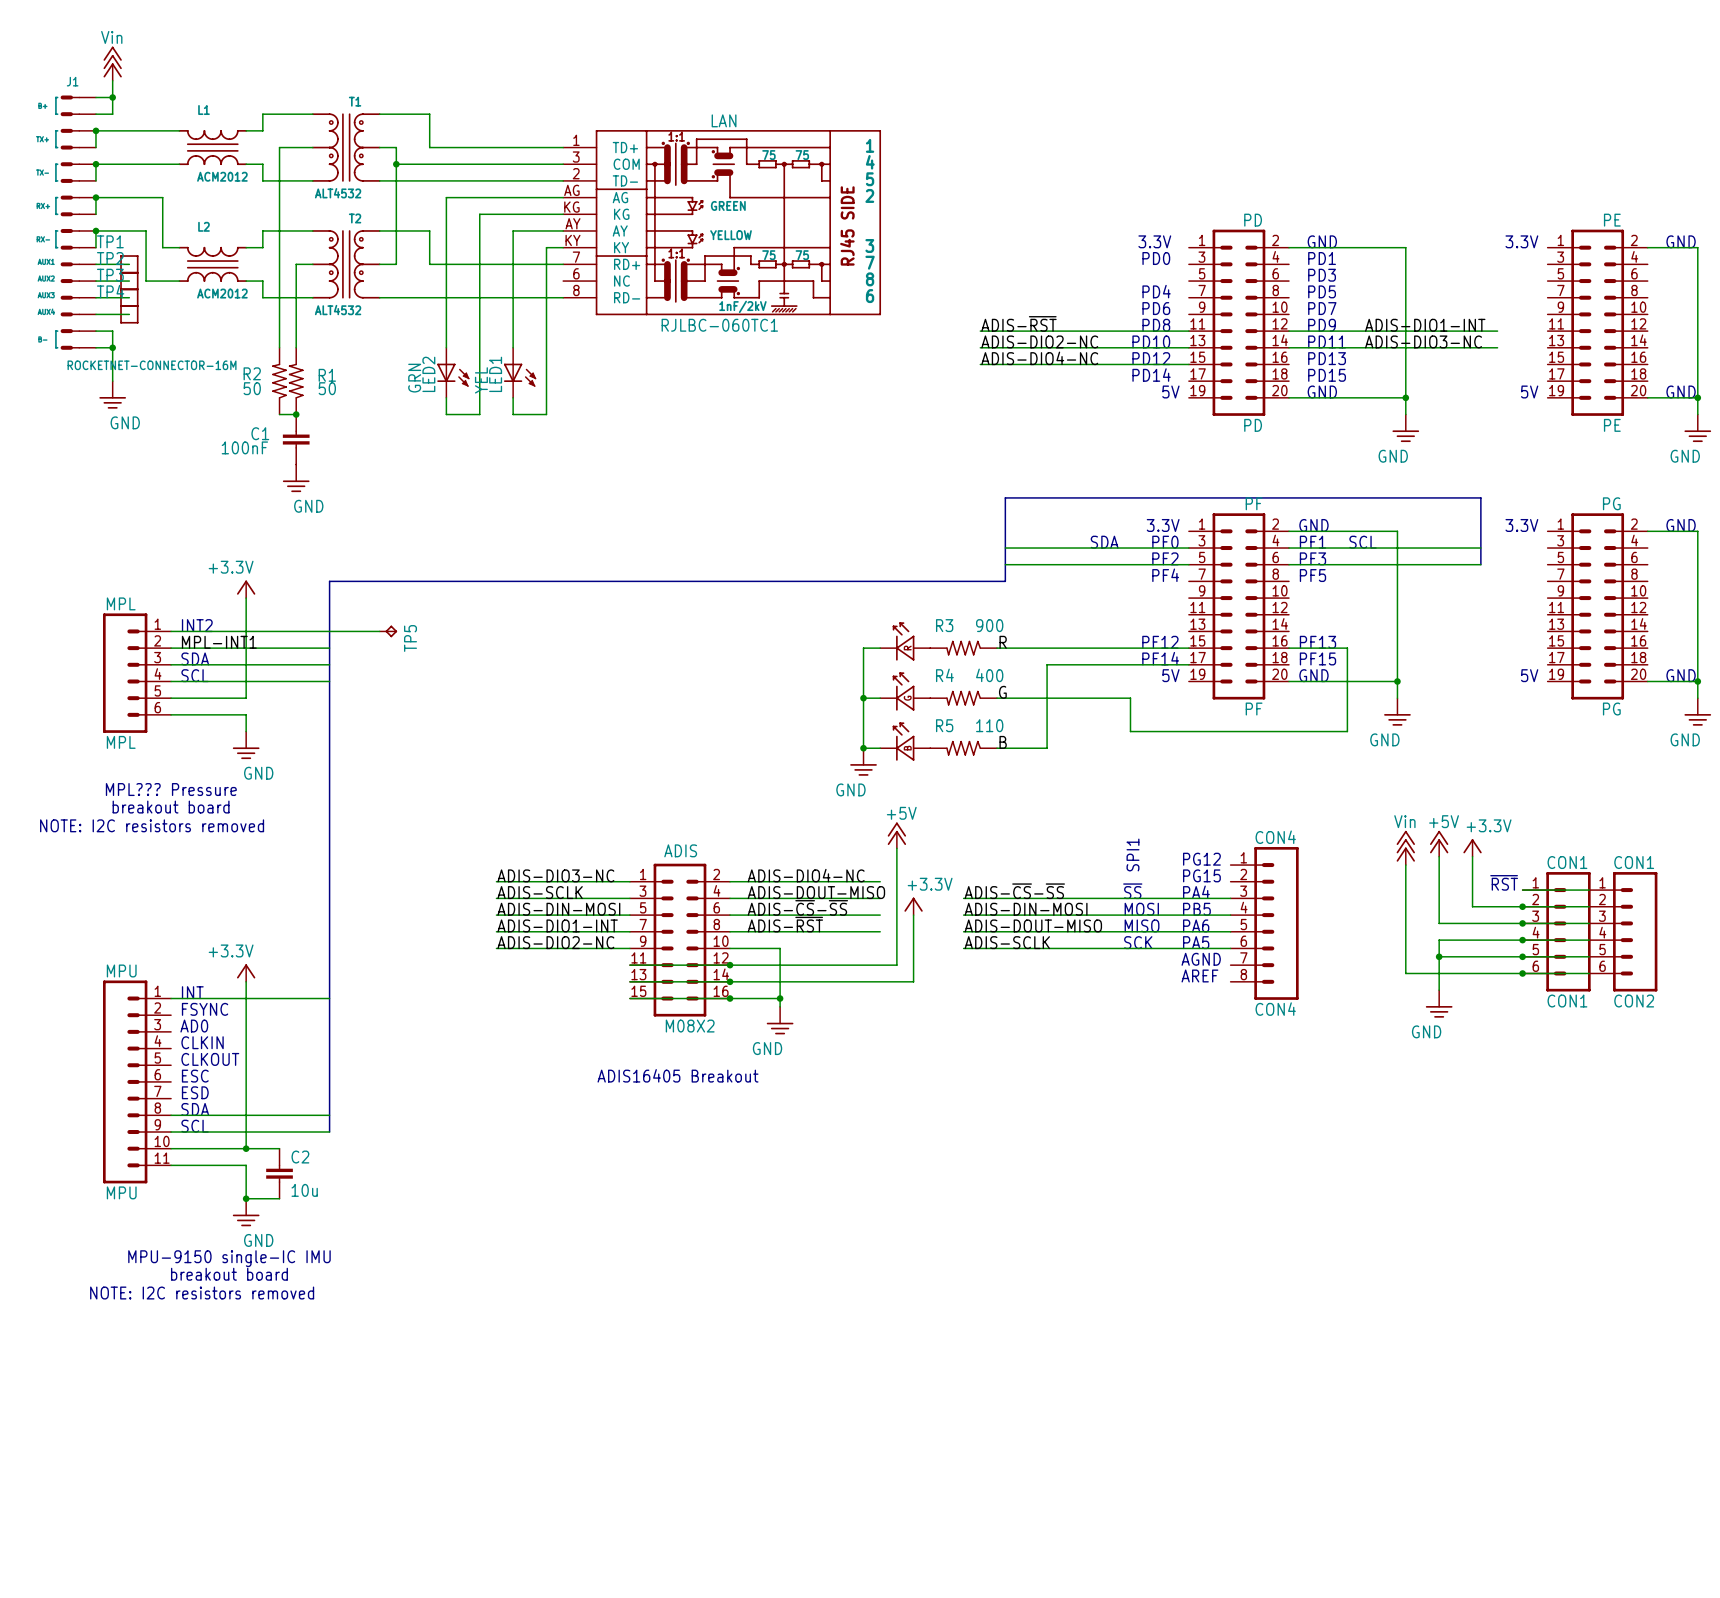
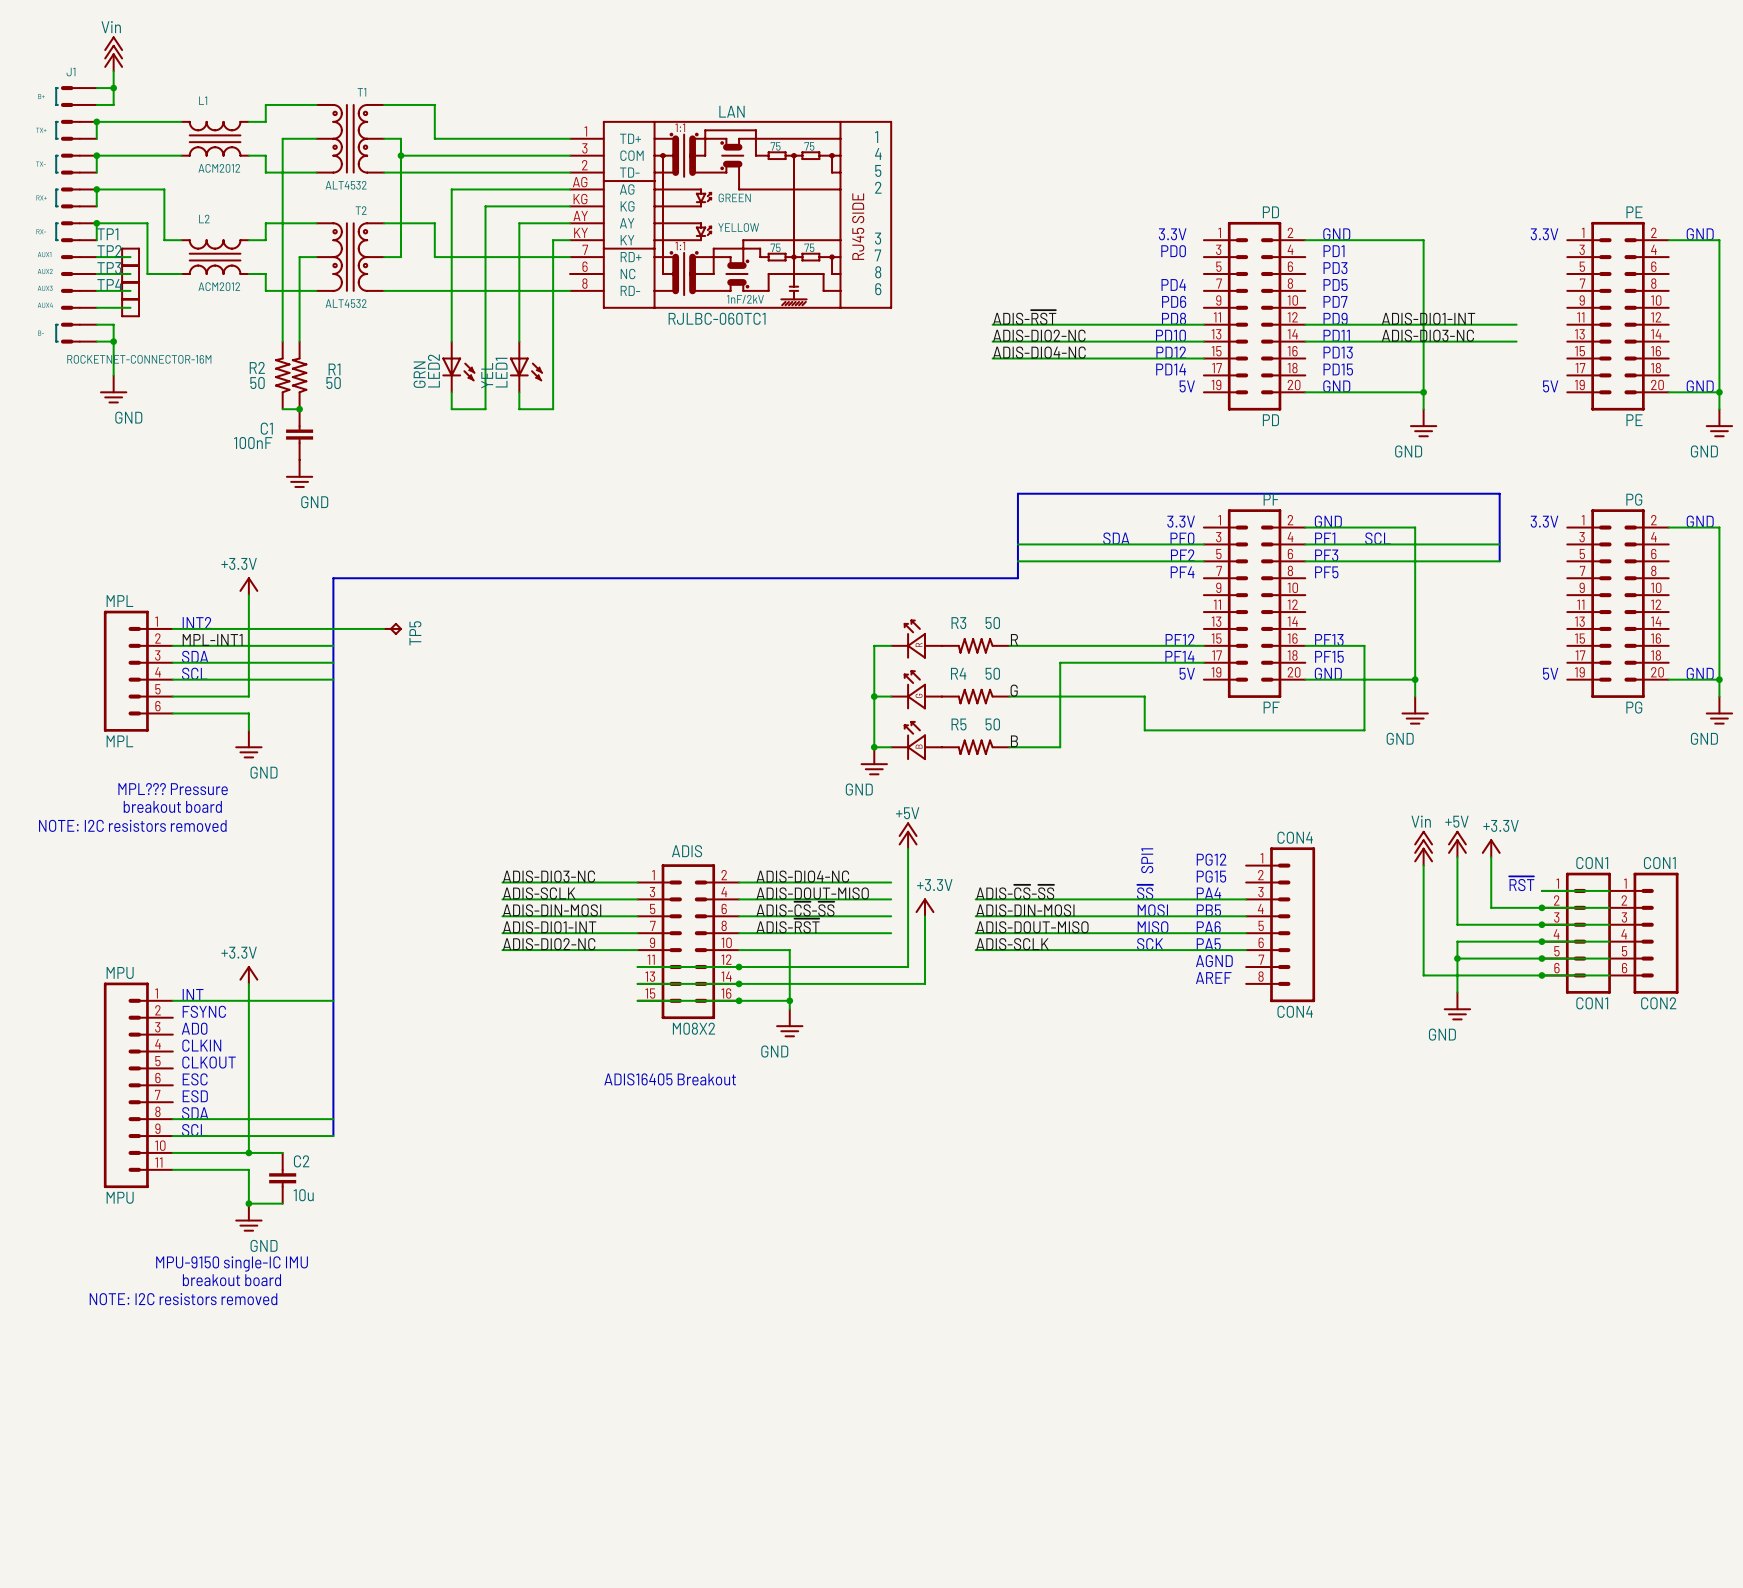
R3 value: 900 (989, 625) -> 50 (992, 623)
R4 value: 400 (989, 675) -> 50 (992, 673)
R5 value: 110 (989, 725) -> 50 (992, 724)

